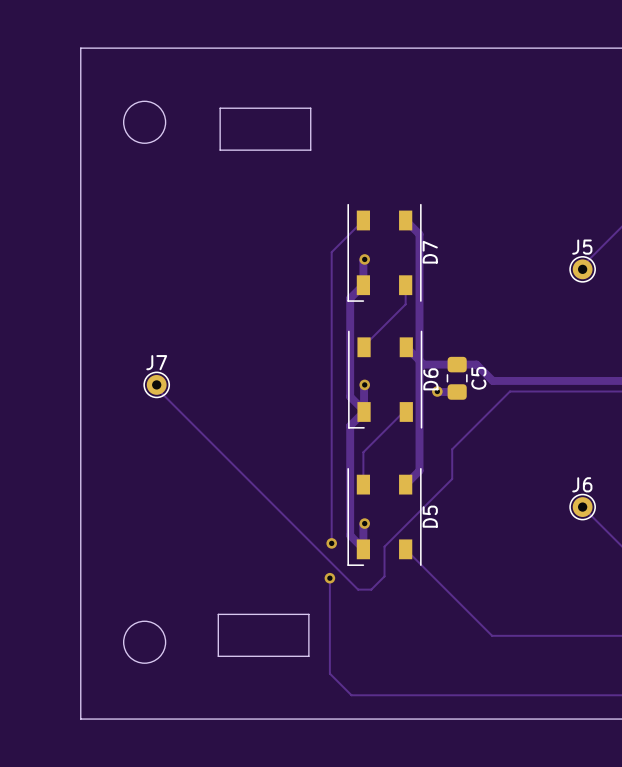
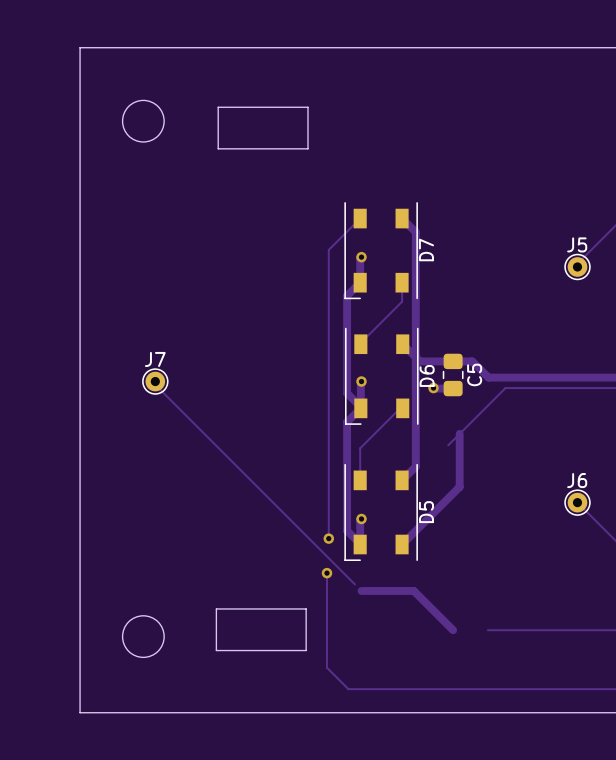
track: (452, 449) (452, 479) (384, 546) (384, 576) (371, 589) (358, 589) -> none
track: (405, 549) (492, 635) -> (402, 544) (459, 486) (459, 433)
track: none -> (361, 590) (413, 590) (453, 630)

